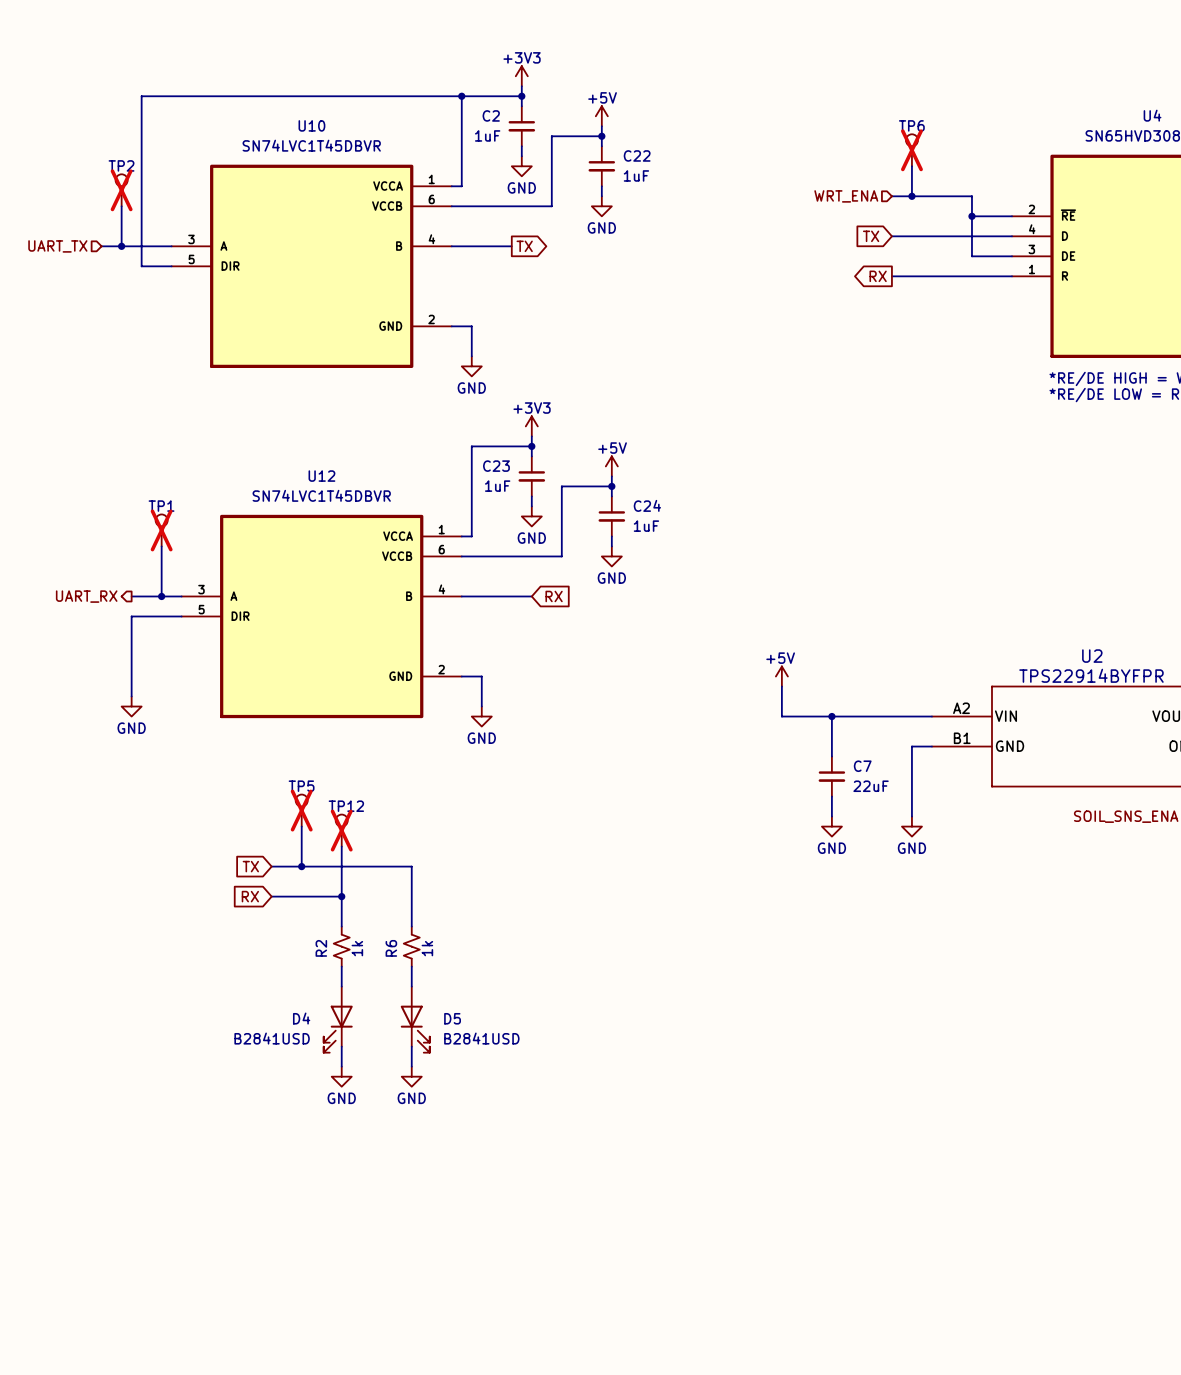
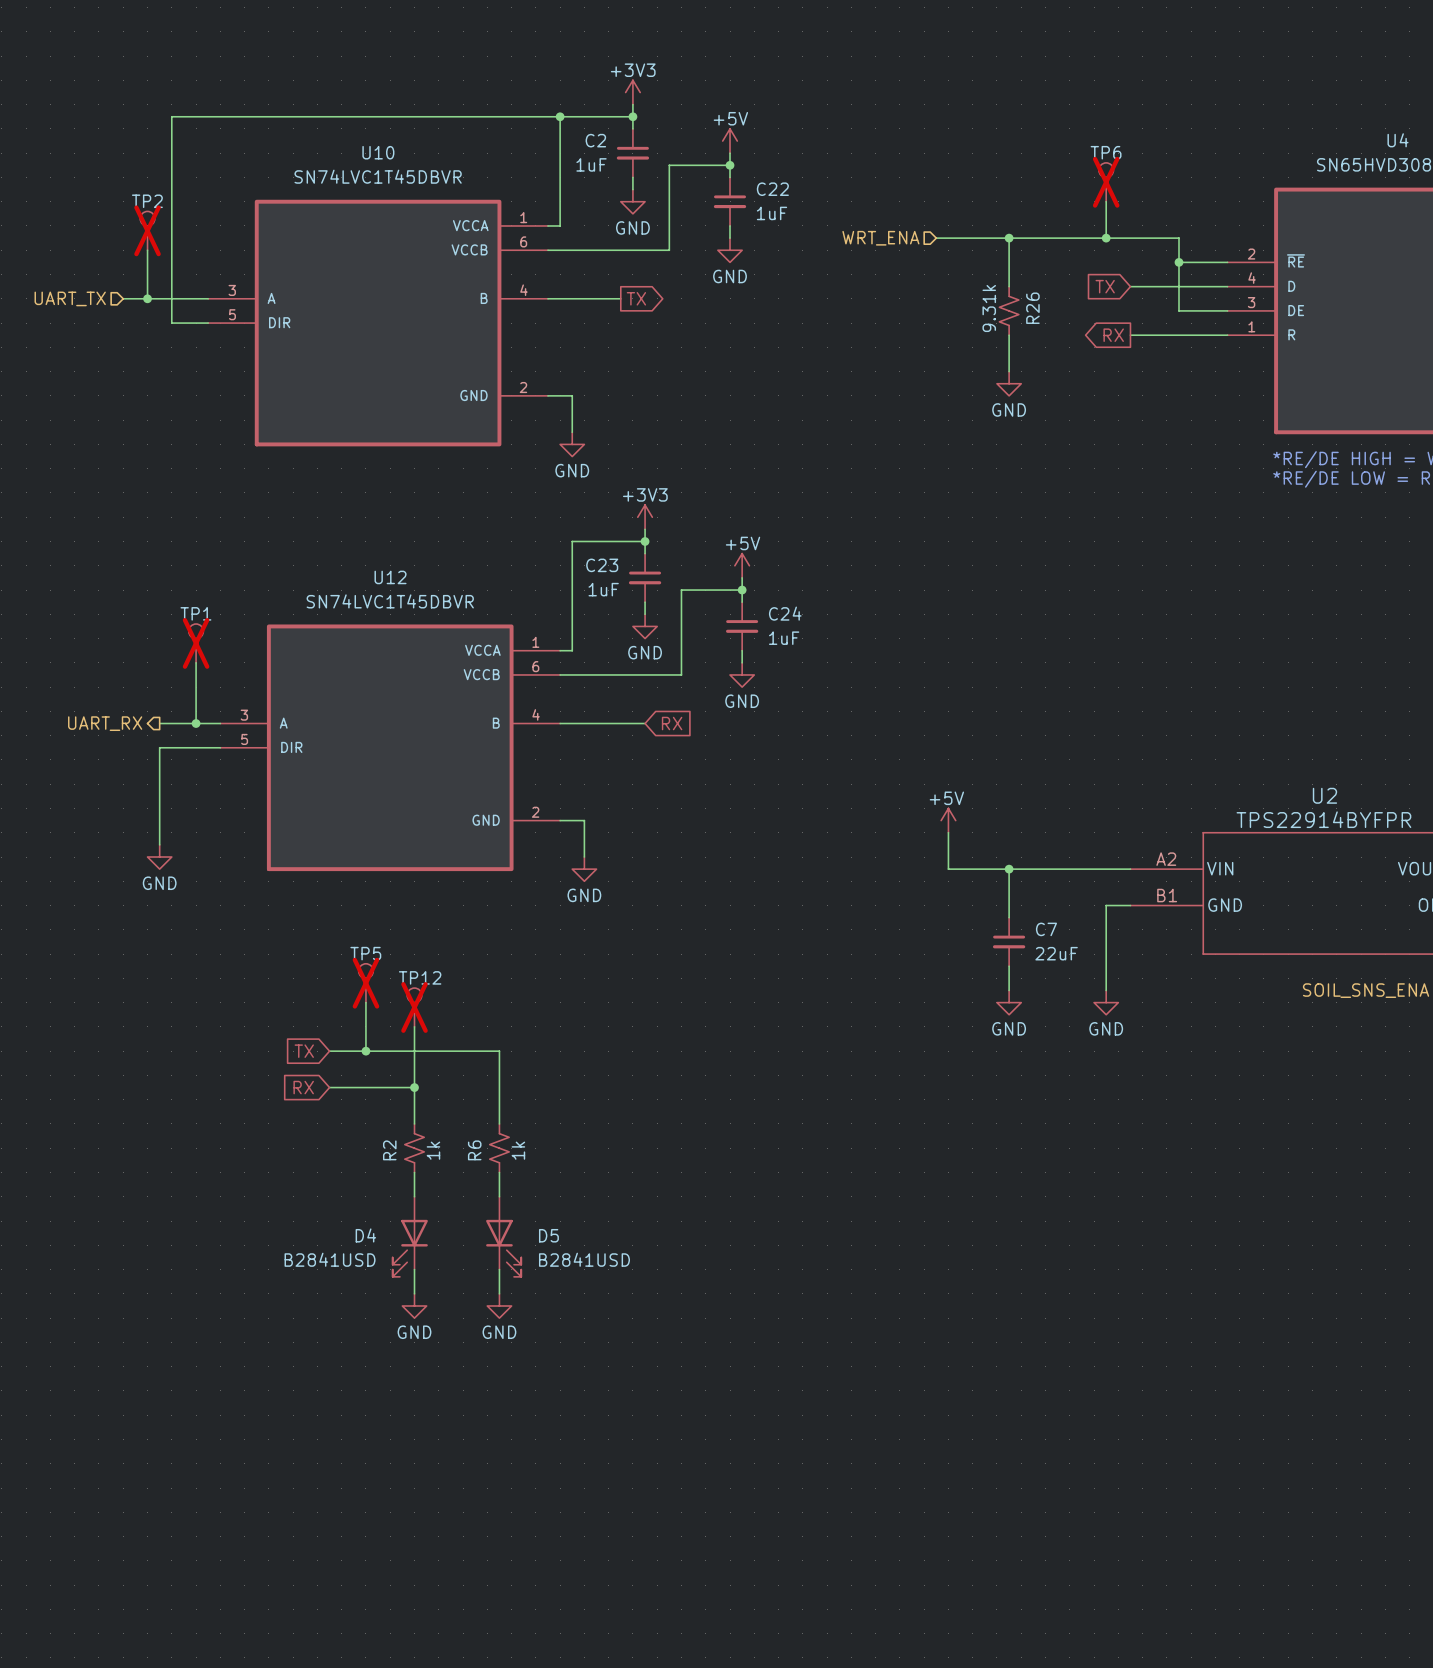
wire: none -> (936, 238) (1081, 238)
wire: none -> (1009, 238) (1009, 286)
junction: none -> (1009, 238)
hierarchical label position: WRT_ENA (846, 196) -> WRT_ENA (880, 238)
global label position: TX (871, 236) -> TX (1105, 286)
wire: (891, 236) (931, 236) -> none
R26: none -> 9.31k (1009, 310)
wire: none -> (1009, 335) (1009, 371)
global label position: RX (878, 276) -> RX (1113, 335)
wire: (891, 276) (931, 276) -> none
power symbol: none -> GND (1009, 383)

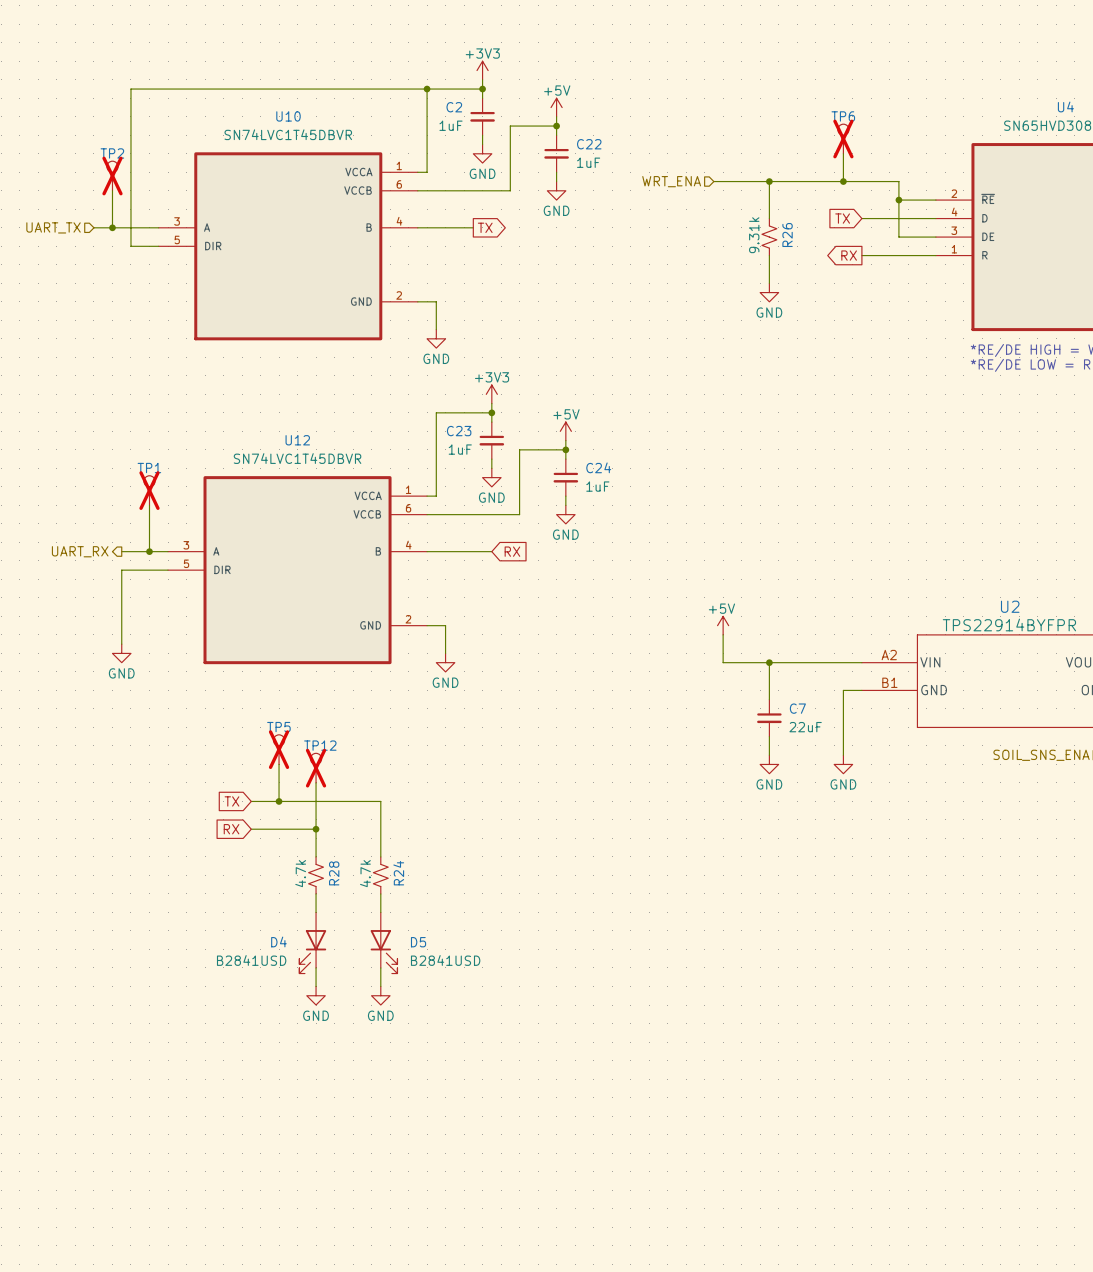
R2 name: R2 (389, 1150) -> R28 (334, 873)
R2 value: 1k (433, 1150) -> 4.7k (300, 873)
R6 name: R6 (474, 1150) -> R24 (398, 873)
R6 value: 1k (518, 1150) -> 4.7k (365, 873)

